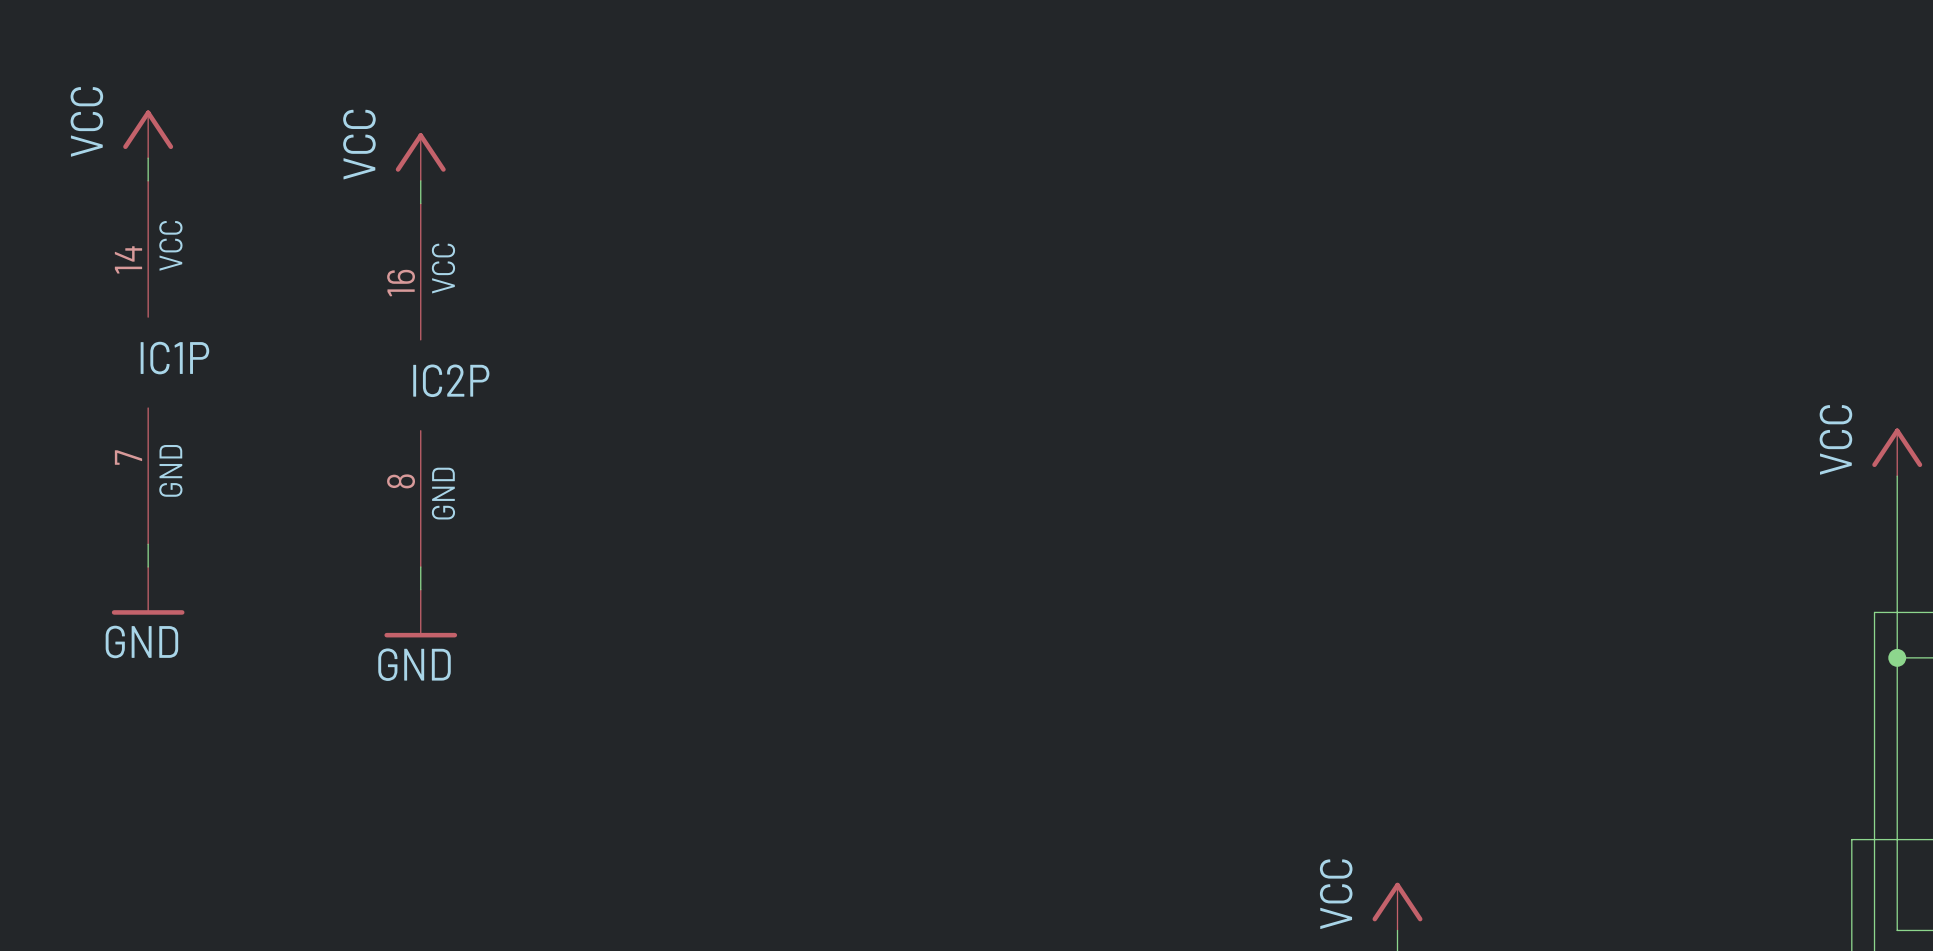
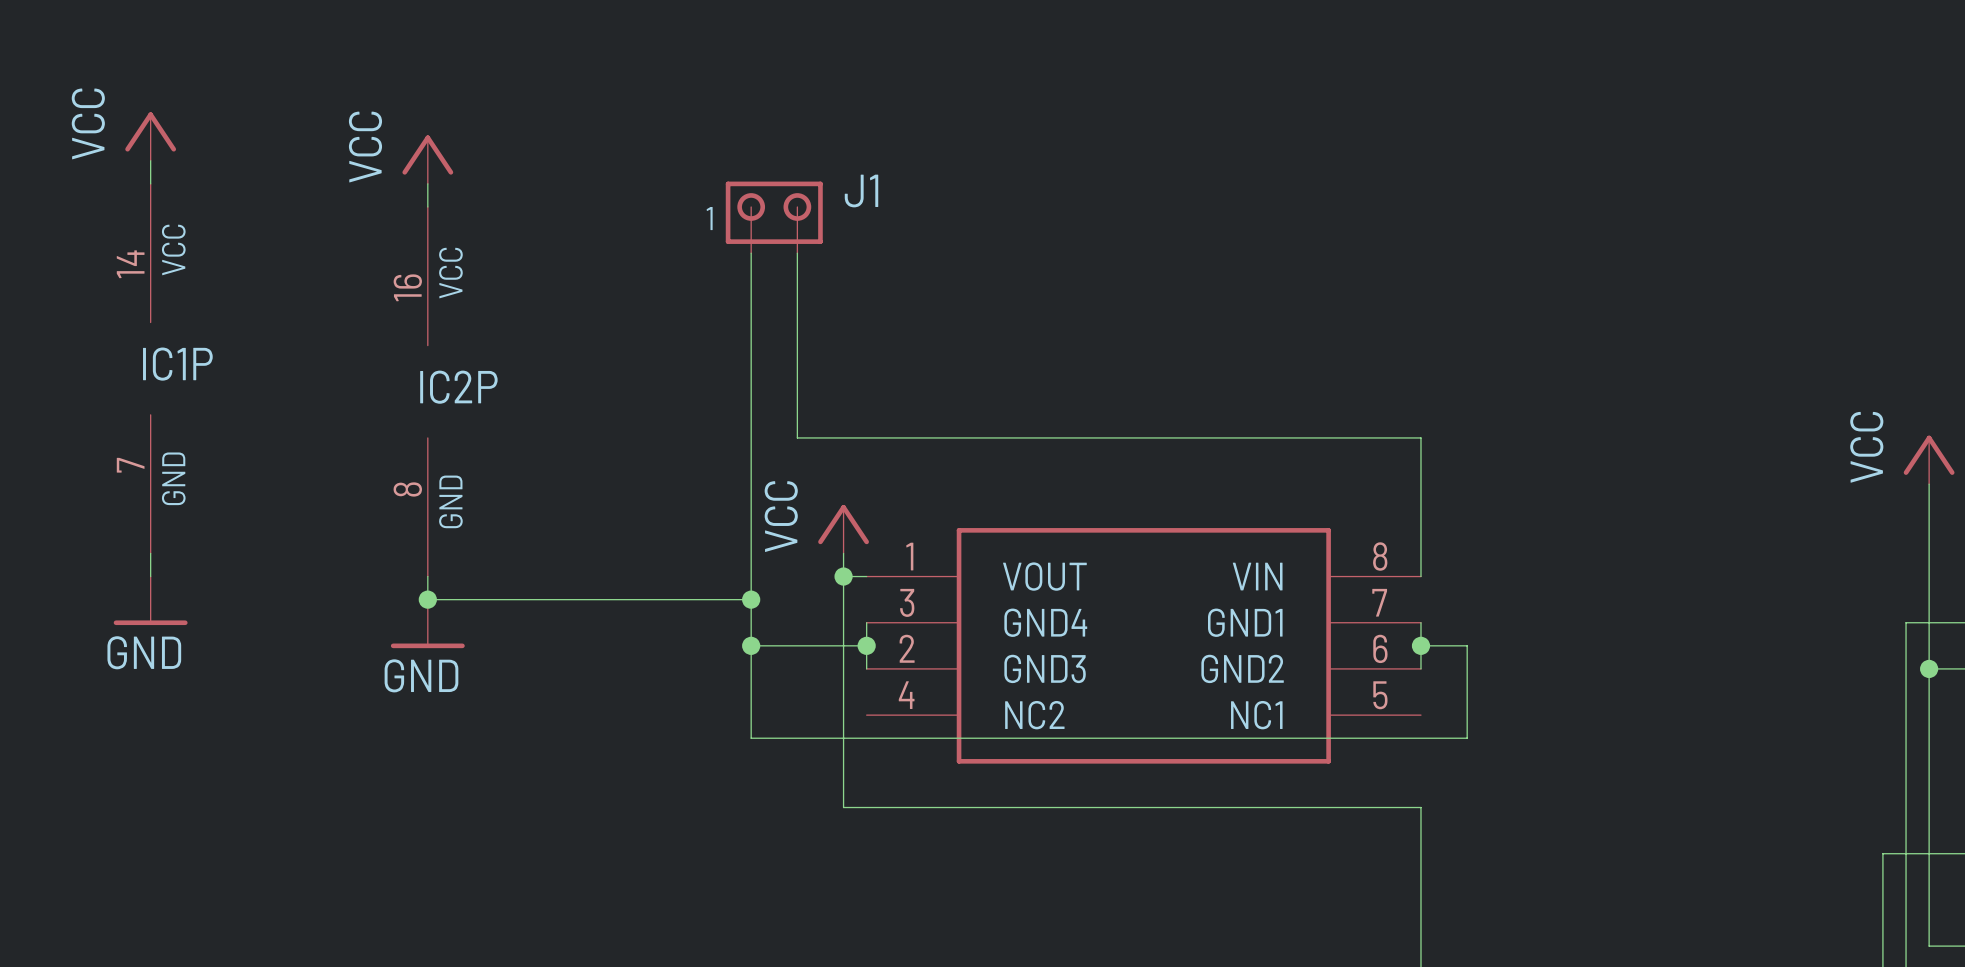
J1: none -> (774, 217)
wire: none -> (751, 253) (751, 738) (1467, 738) (1467, 645) (1420, 645)
wire: none -> (797, 253) (797, 437) (1420, 437) (1420, 576)
power symbol: none -> VCC (843, 529)
wire: none -> (843, 553) (843, 807) (1420, 807) (1420, 946)
wire: none -> (843, 576) (866, 576)
junction: none -> (843, 576)
wire: none -> (427, 599) (751, 599)
junction: none -> (427, 599)
junction: none -> (751, 599)
wire: none -> (866, 622) (866, 668)
wire: none -> (1420, 622) (1420, 668)
wire: none -> (751, 645) (866, 645)
junction: none -> (751, 645)
junction: none -> (866, 645)
part: none -> (1143, 645)
junction: none -> (1420, 645)
power symbol: VCC (1397, 906) -> none

